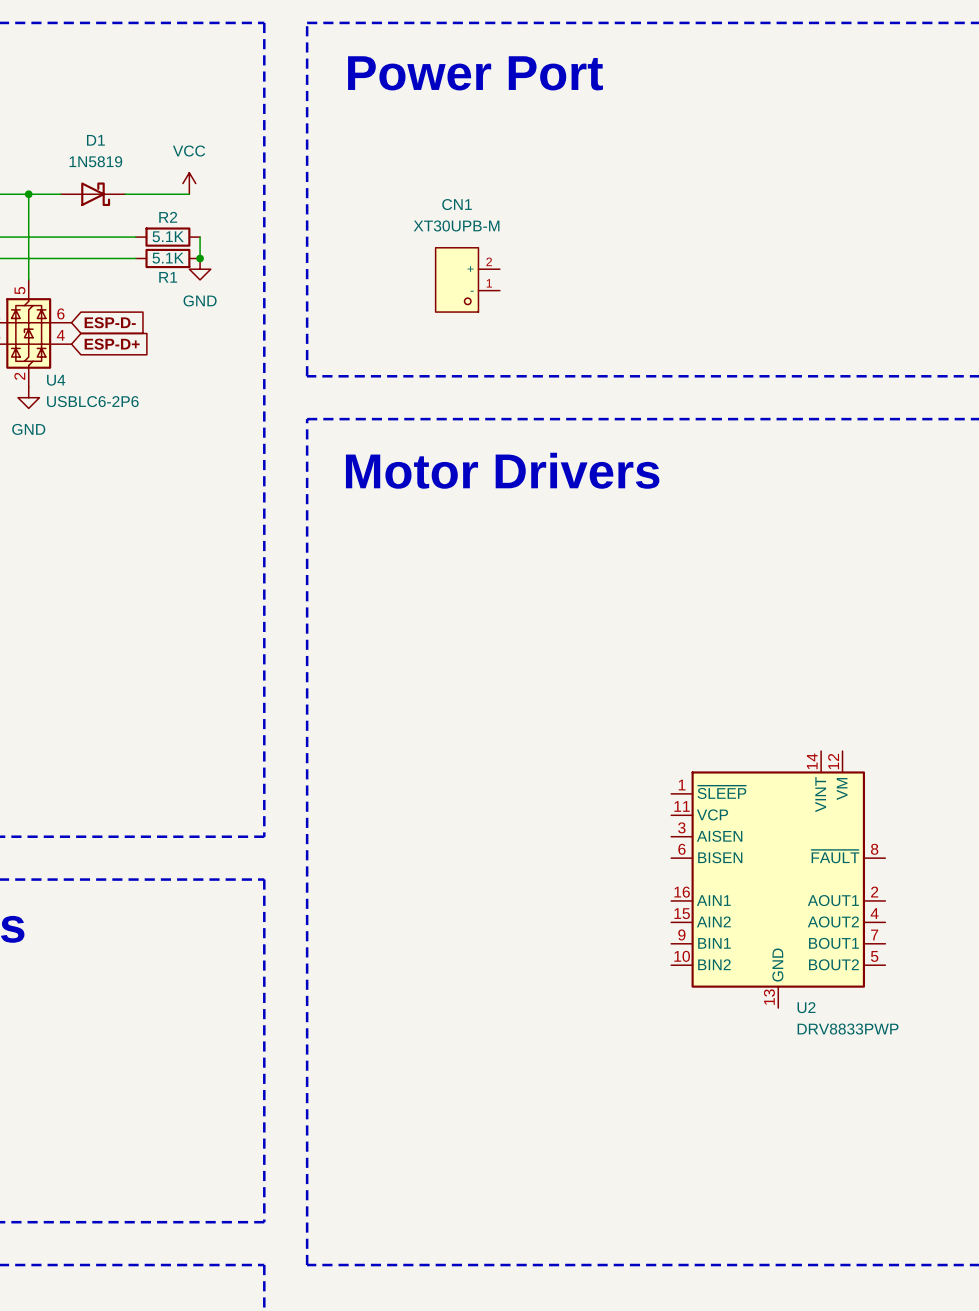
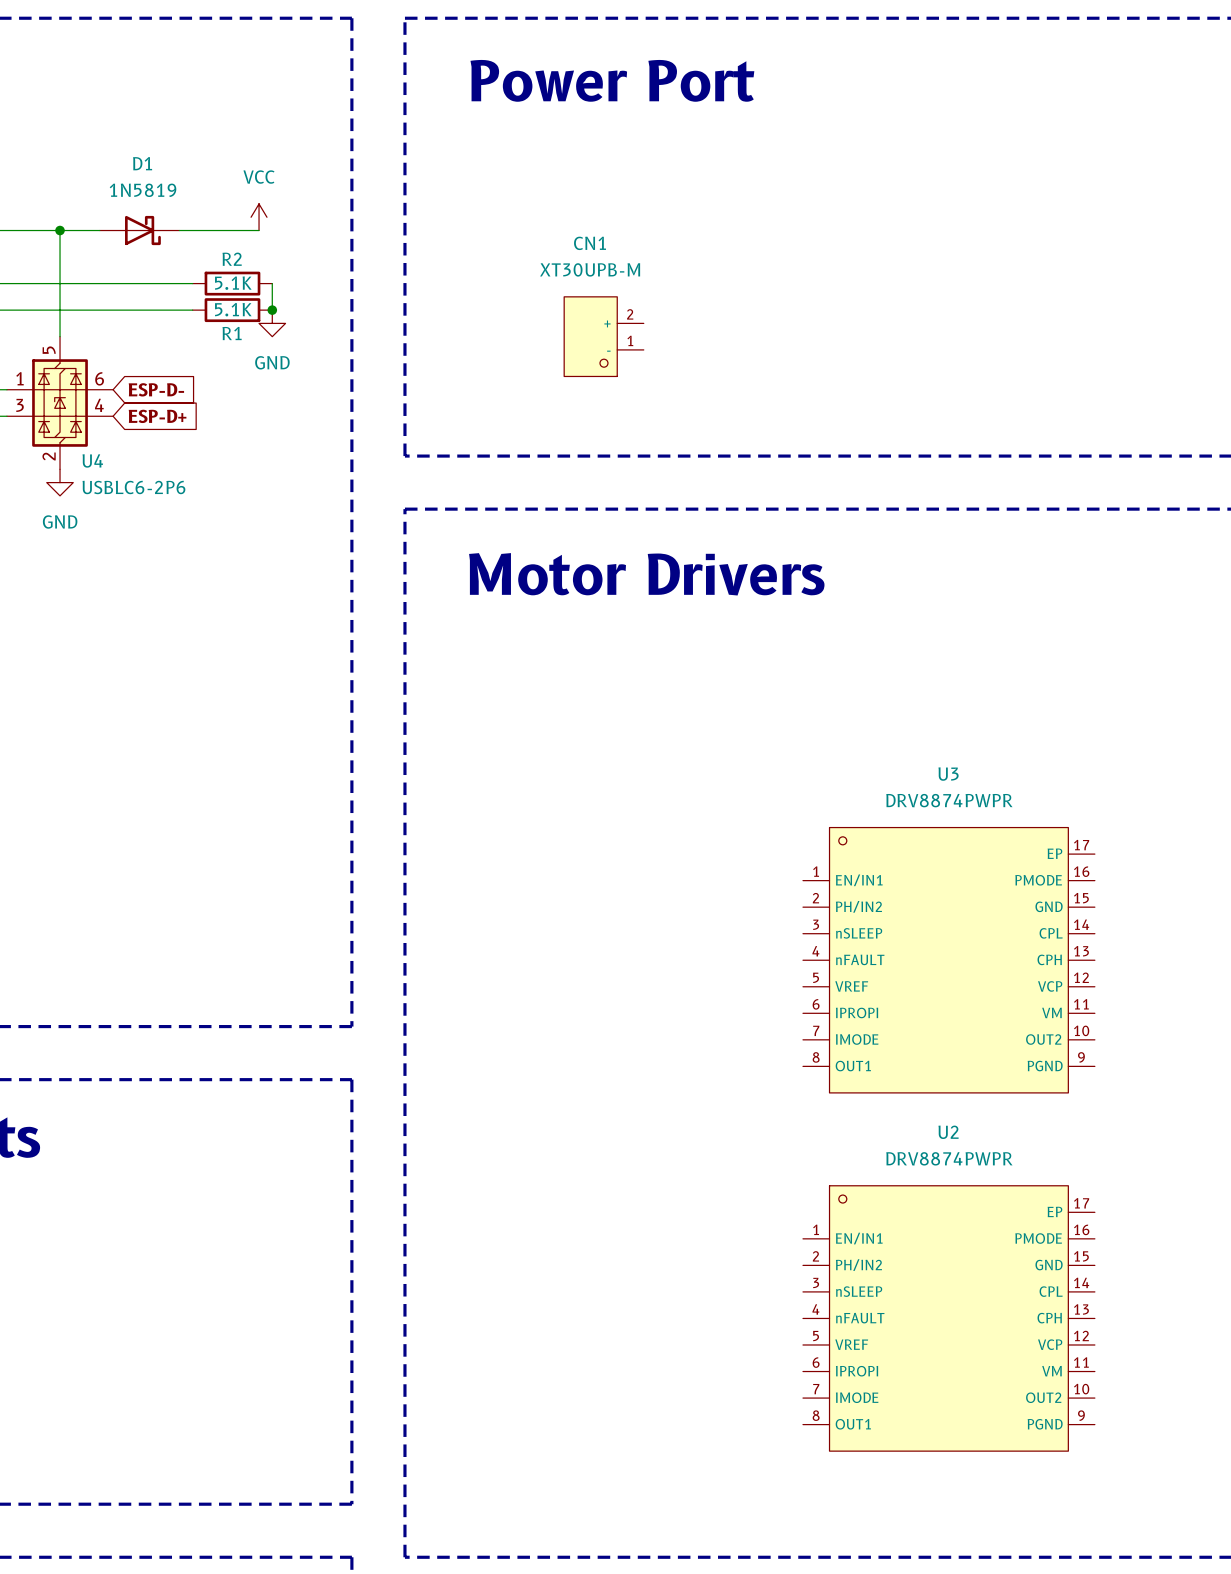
U2 symbol: [671, 751, 886, 1009] -> [802, 1185, 1095, 1452]
U3: none -> DRV8874PWPR (948, 960)
U2 name position: U2 (806, 1007) -> U2 (948, 1132)
U2 value: DRV8833PWP (848, 1029) -> DRV8874PWPR (949, 1158)

